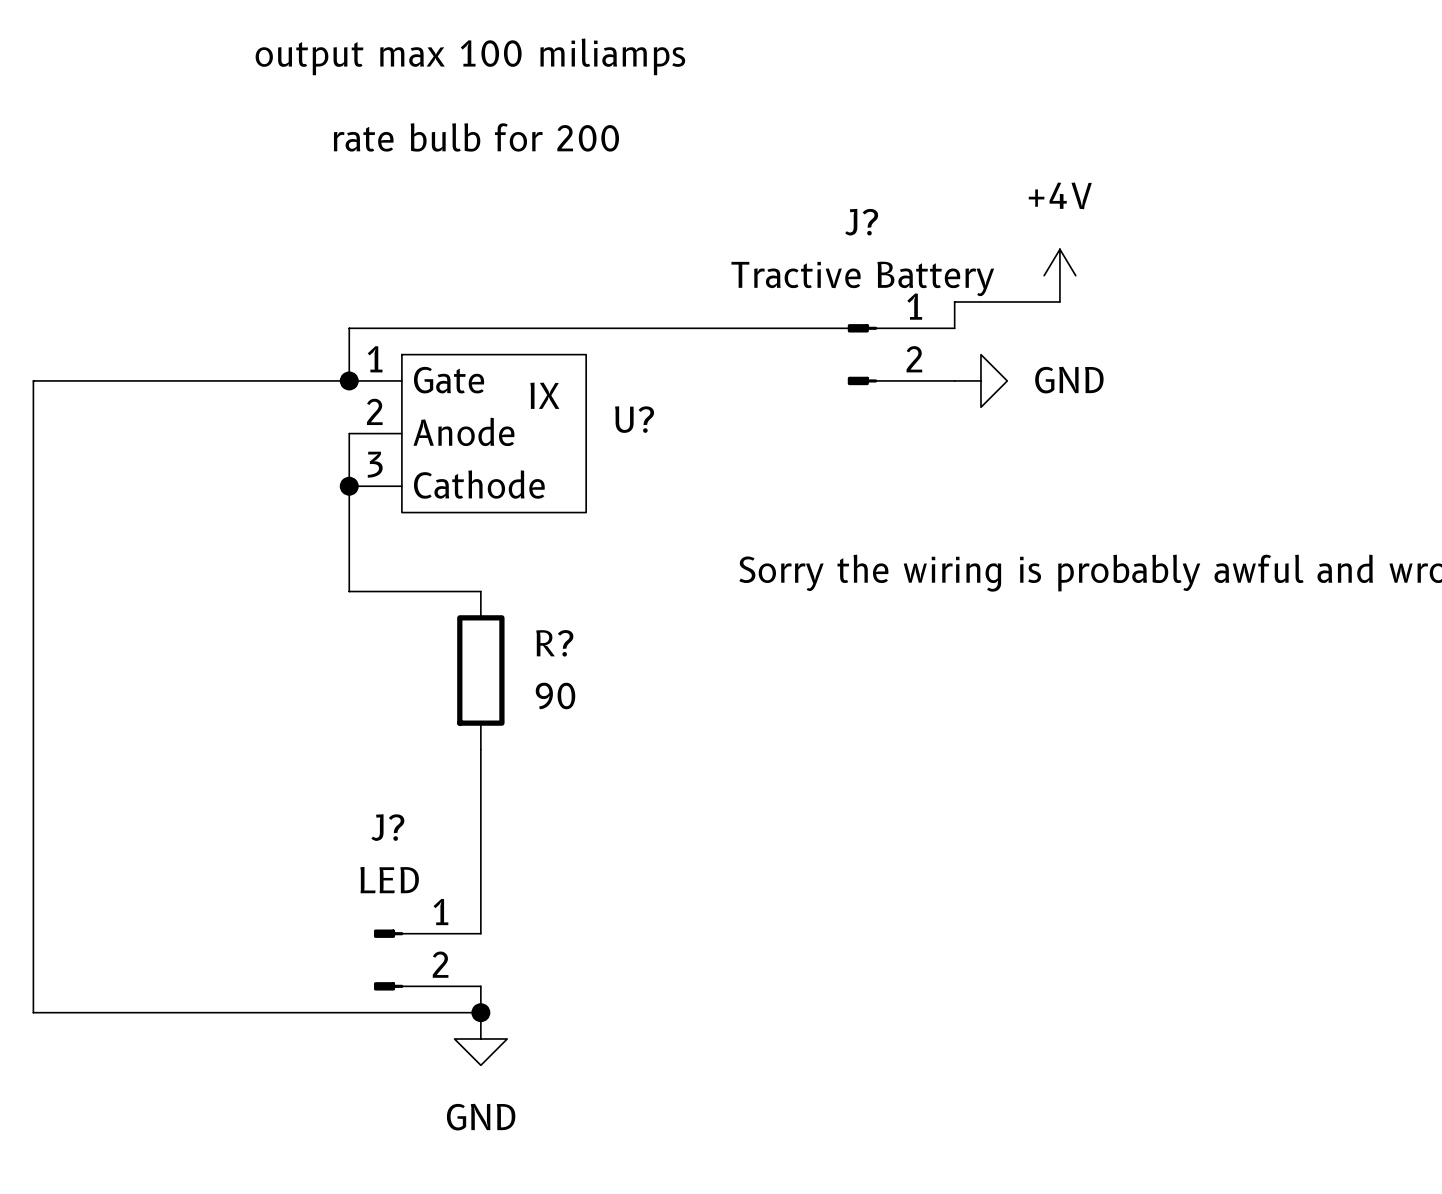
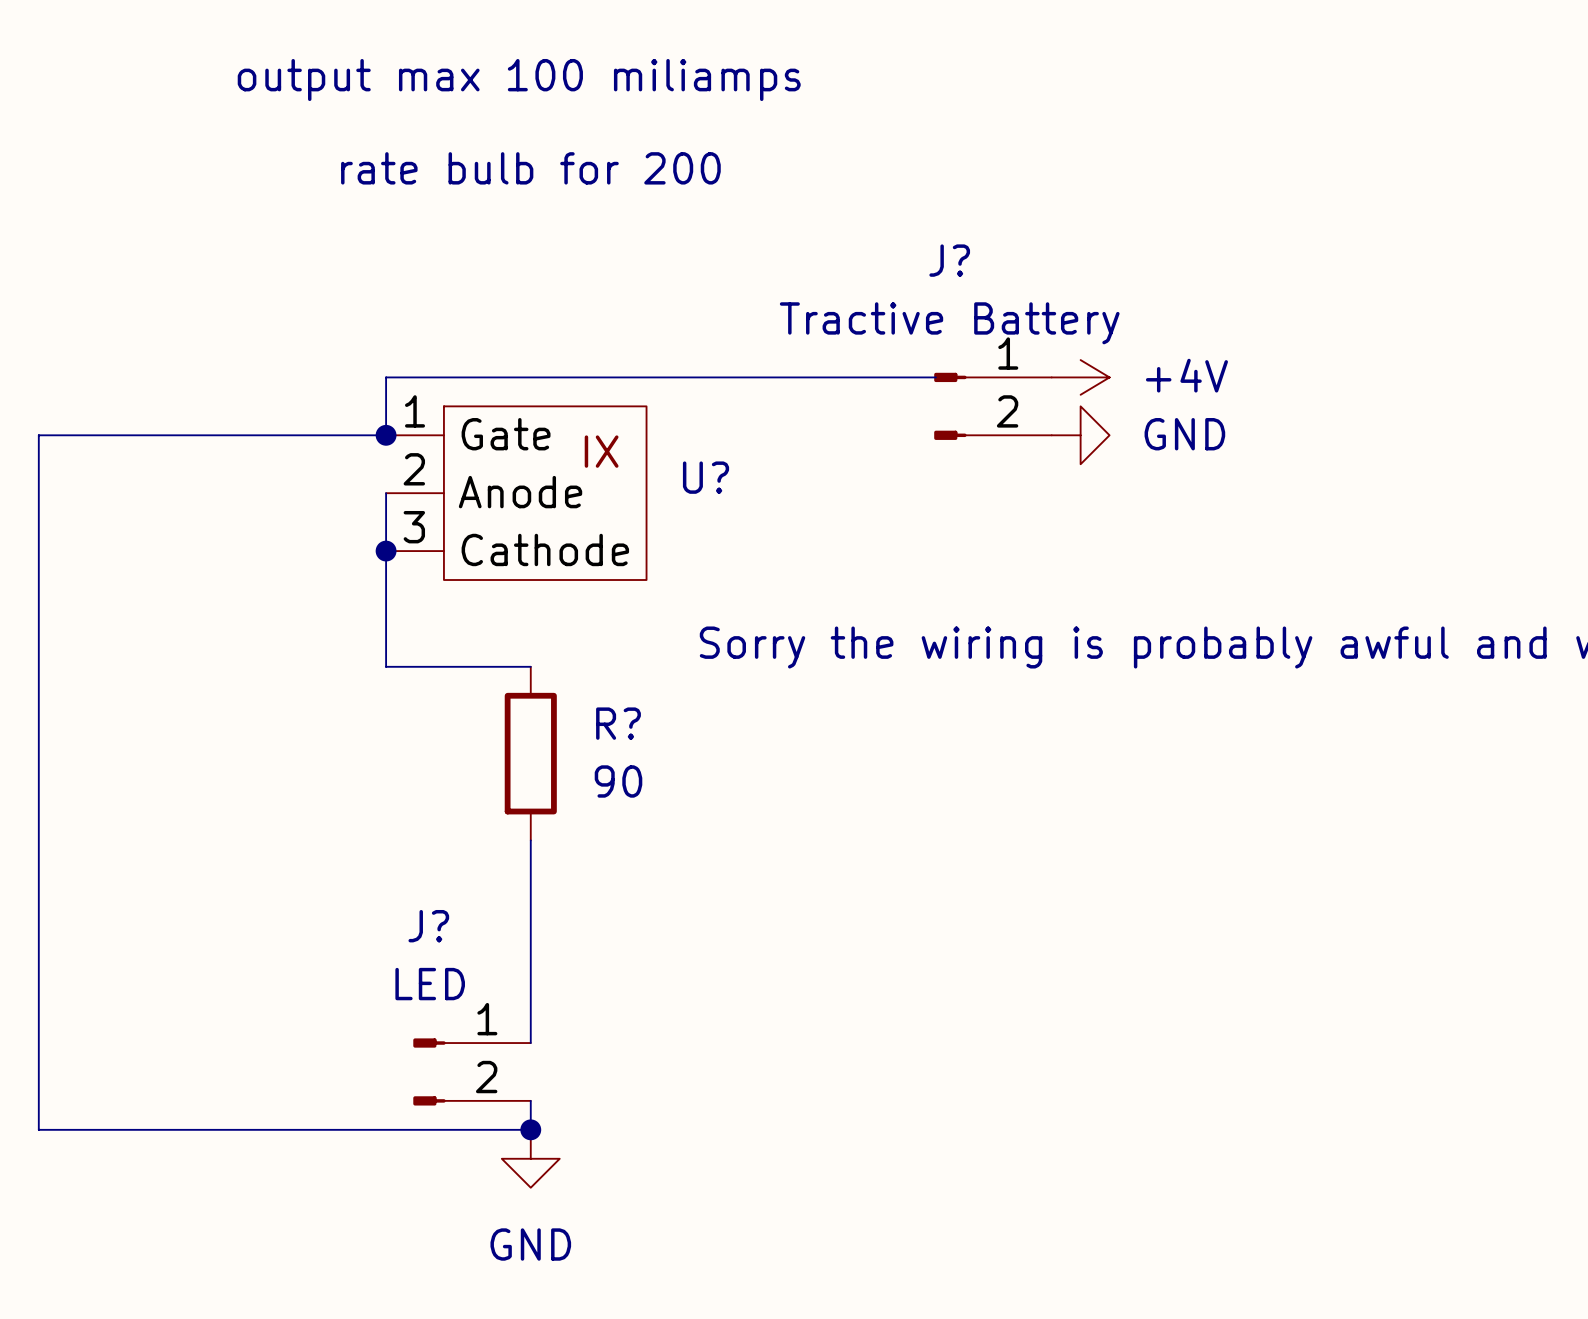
power symbol rotation: 0° (1059, 275) -> 90° clockwise (1080, 377)
power symbol position: +4V (1059, 275) -> +4V (1080, 377)
wire: (1059, 301) (954, 301) (954, 328) -> none

